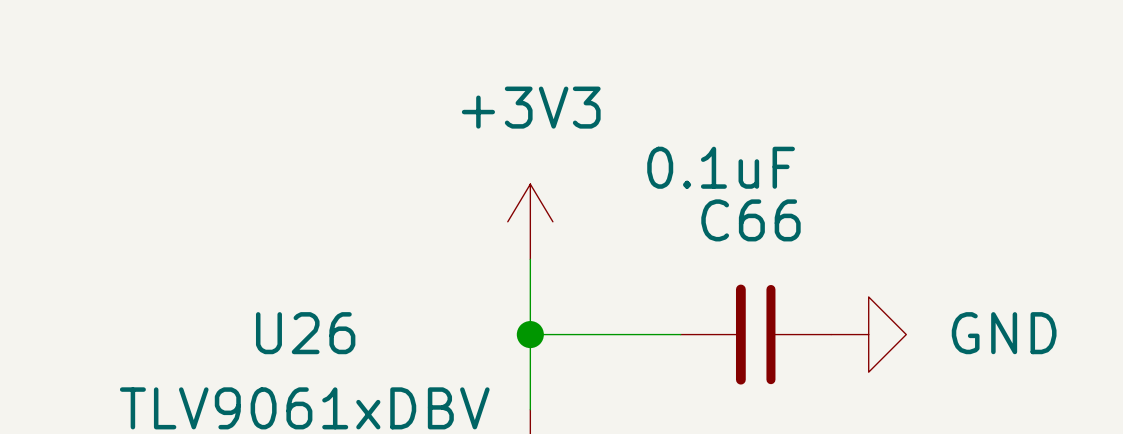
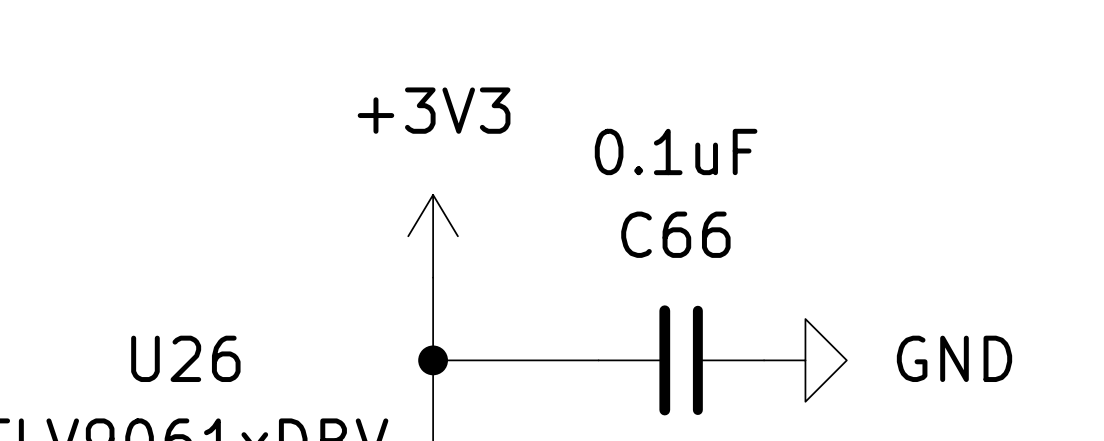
C66 value position: 0.1uF (721, 167) -> 0.1uF (676, 151)

